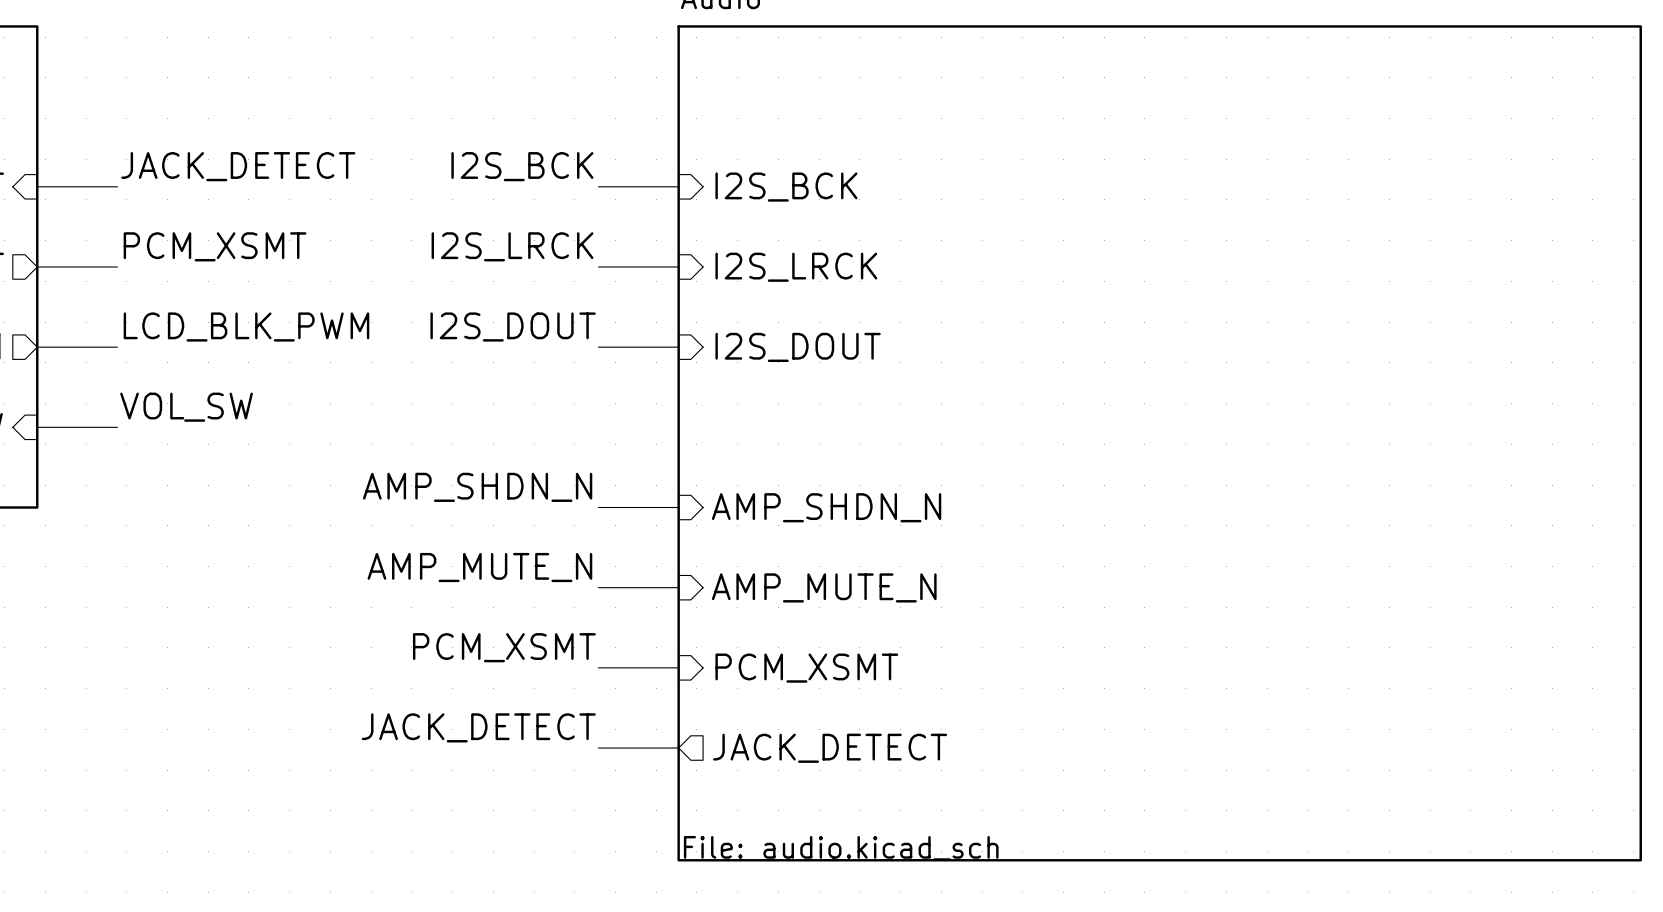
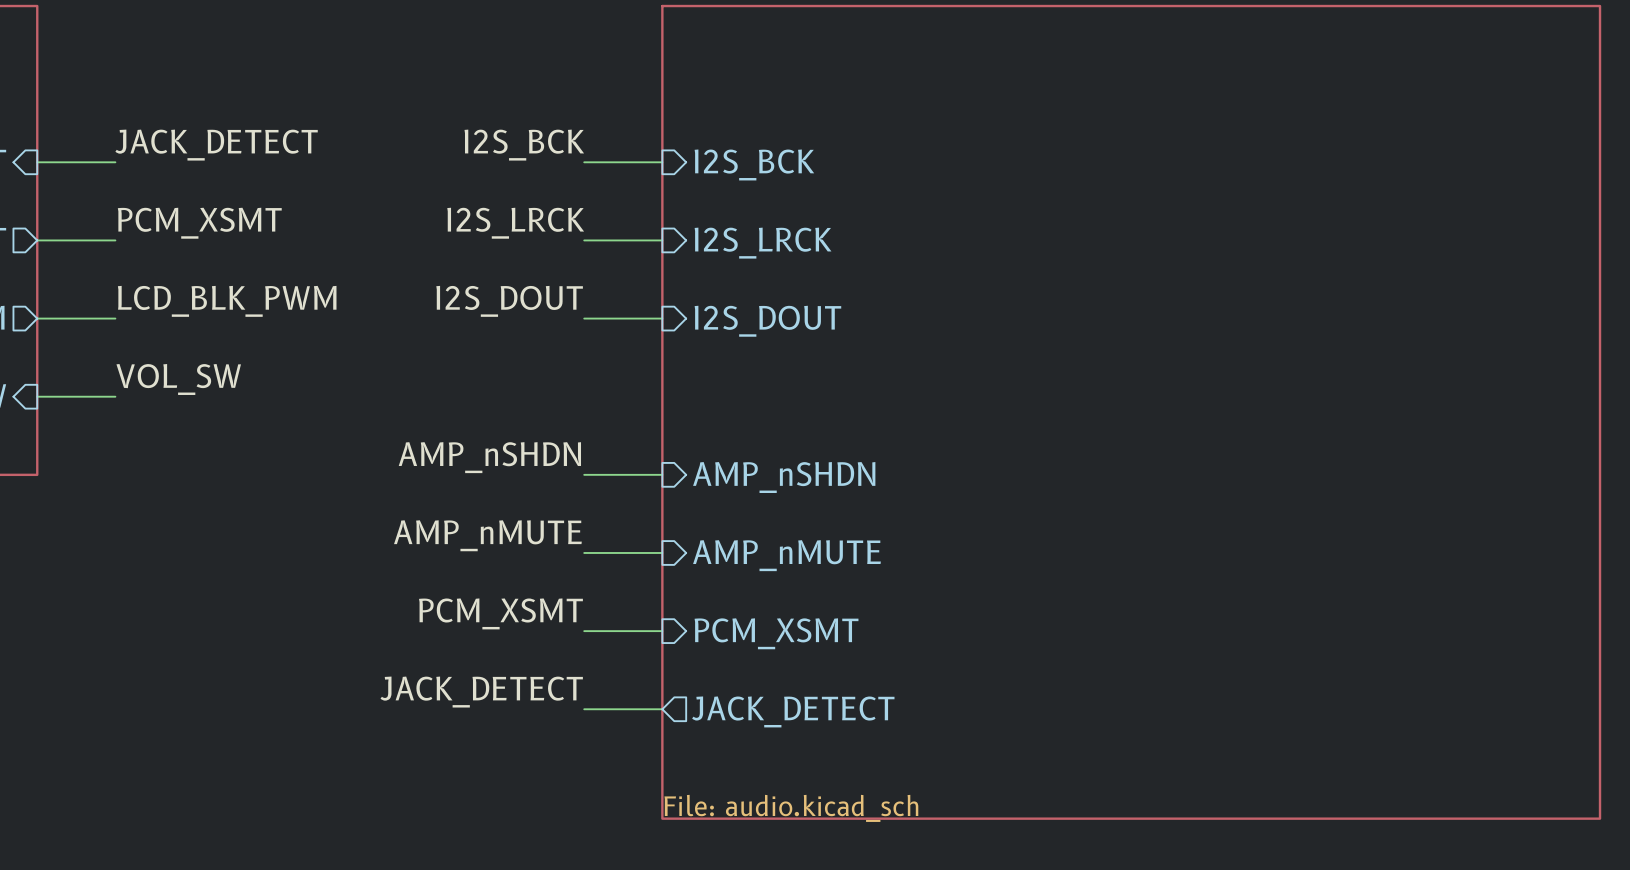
label: AMP_SHDN_N (477, 487) -> AMP_nSHDN (489, 457)
sheet pin: AMP_SHDN_N (826, 507) -> AMP_nSHDN (784, 477)
label: AMP_MUTE_N (479, 567) -> AMP_nMUTE (487, 535)
sheet pin: AMP_MUTE_N (824, 587) -> AMP_nMUTE (786, 555)

